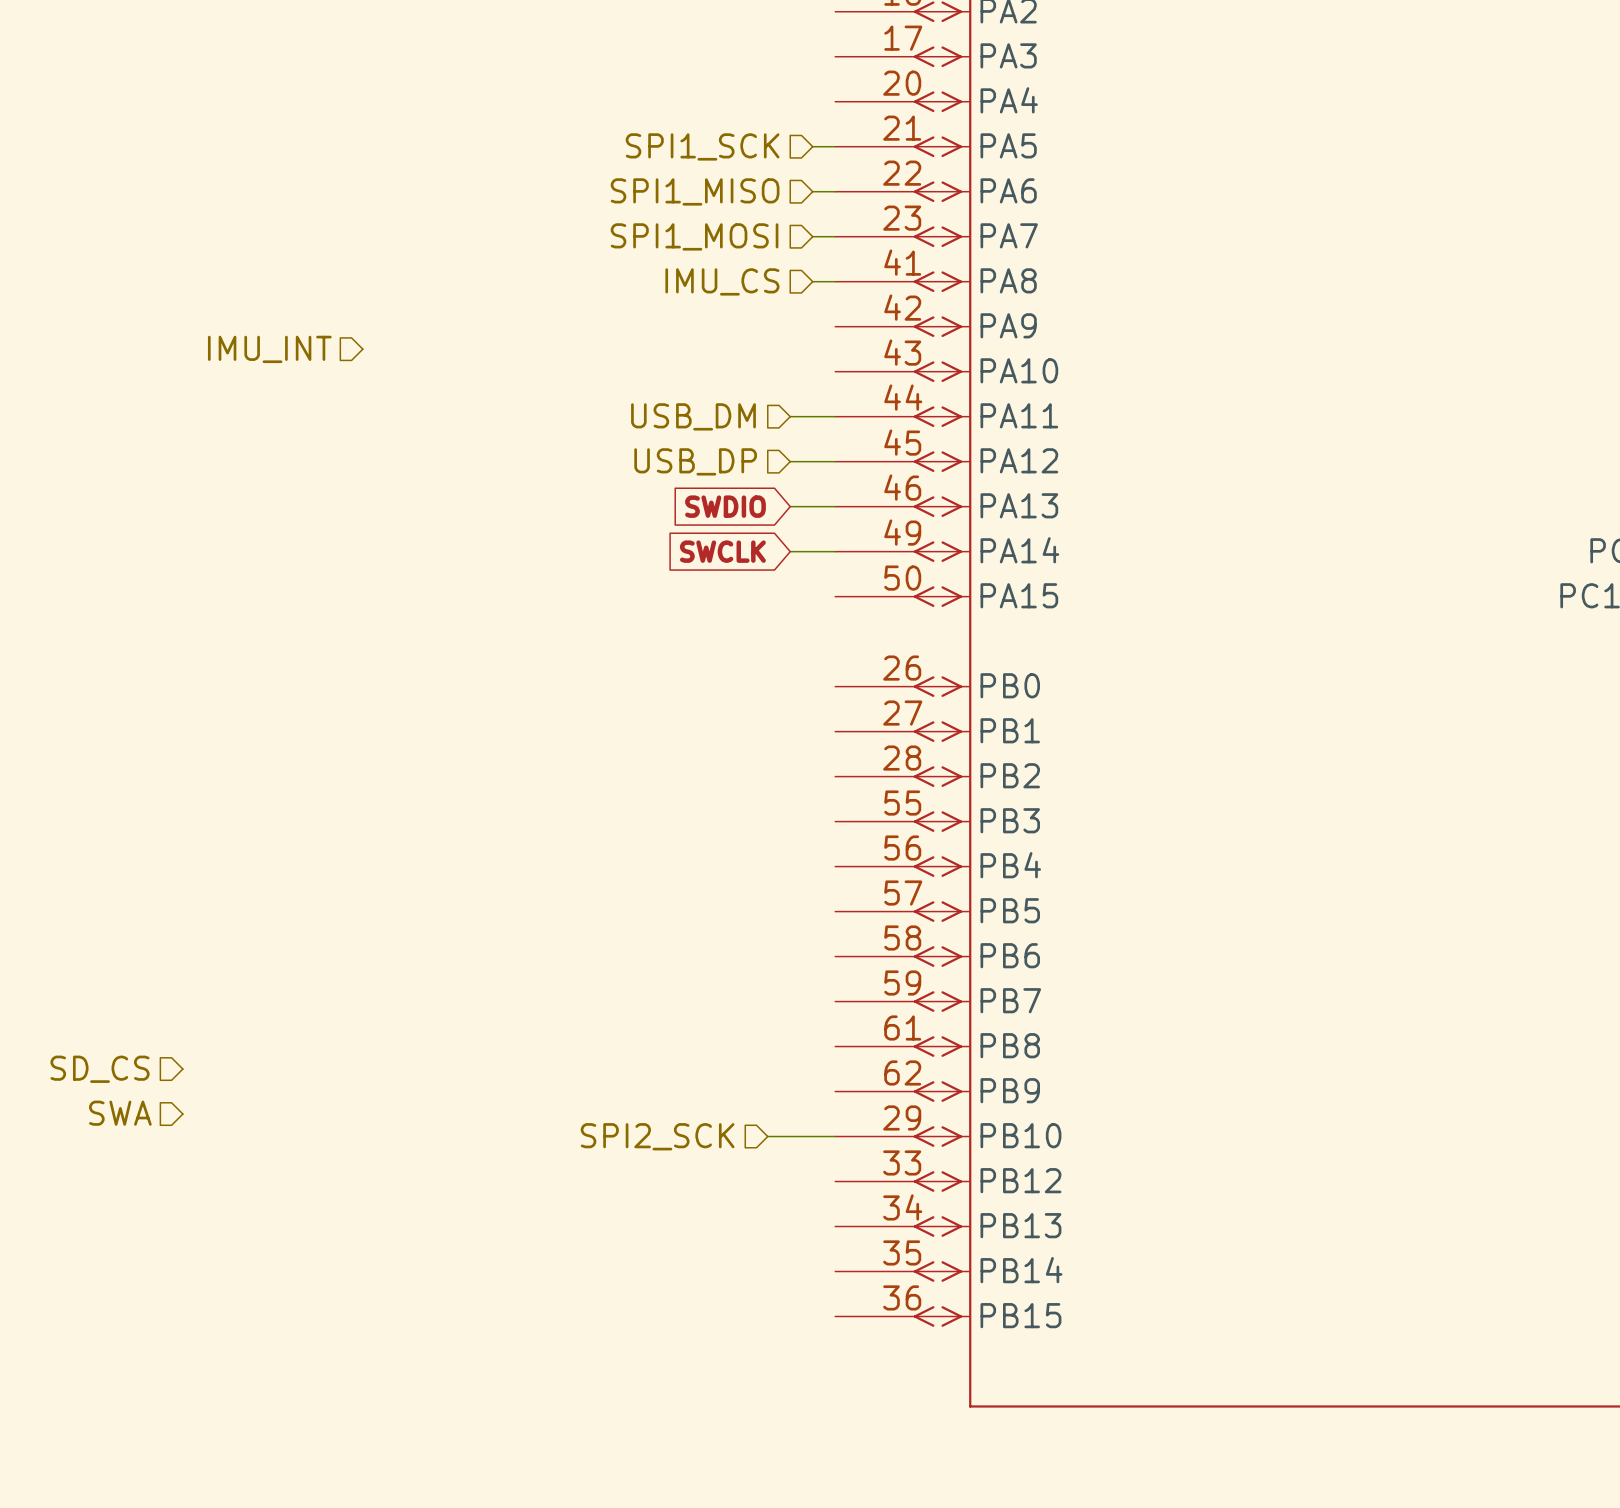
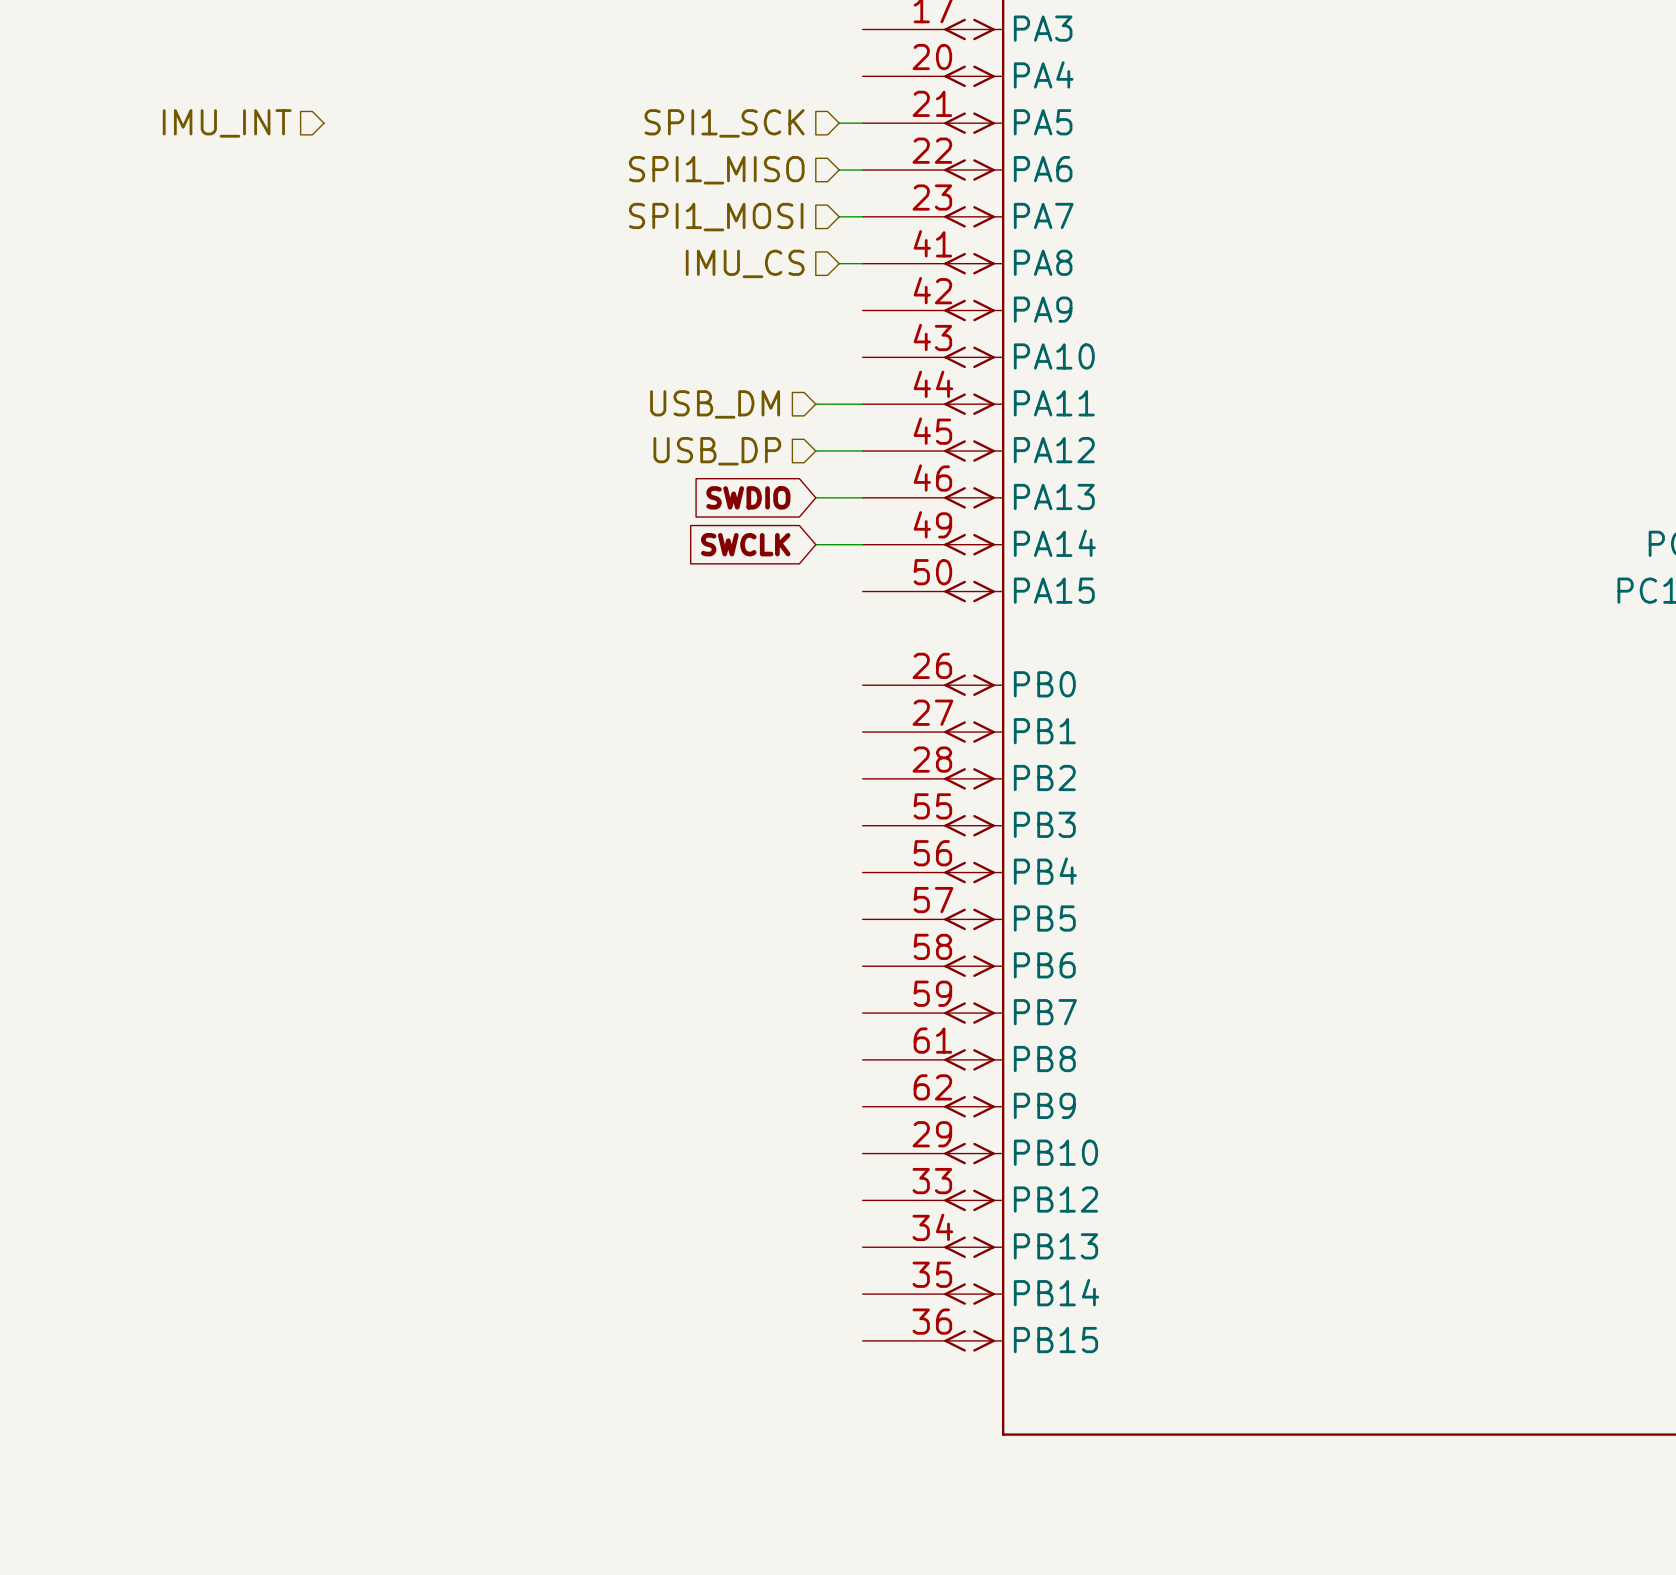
hierarchical label position: IMU_INT (269, 349) -> IMU_INT (227, 123)
hierarchical label: SD_CS (100, 1069) -> none
hierarchical label: SWA (120, 1113) -> none
hierarchical label: SPI2_SCK (657, 1136) -> none
wire: (767, 1136) (835, 1136) -> none

